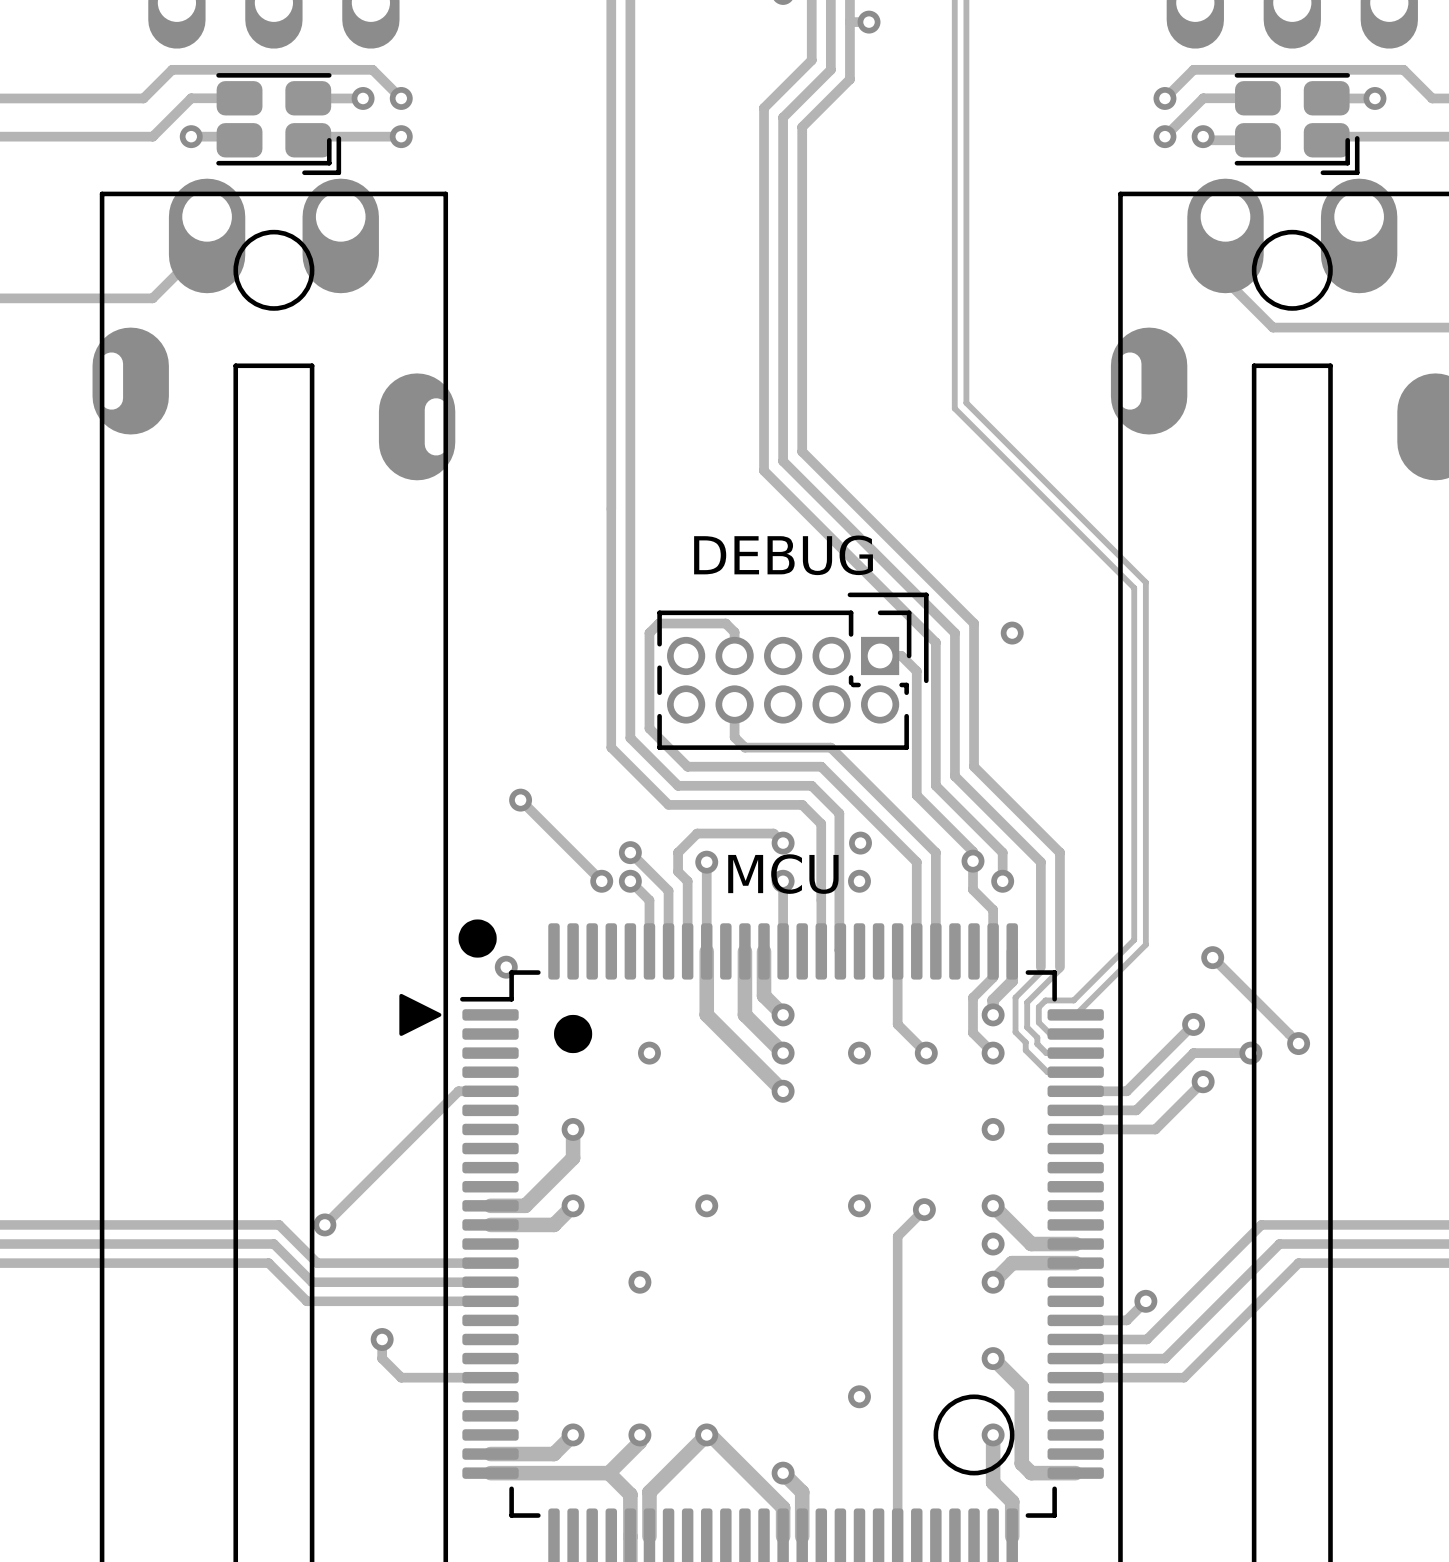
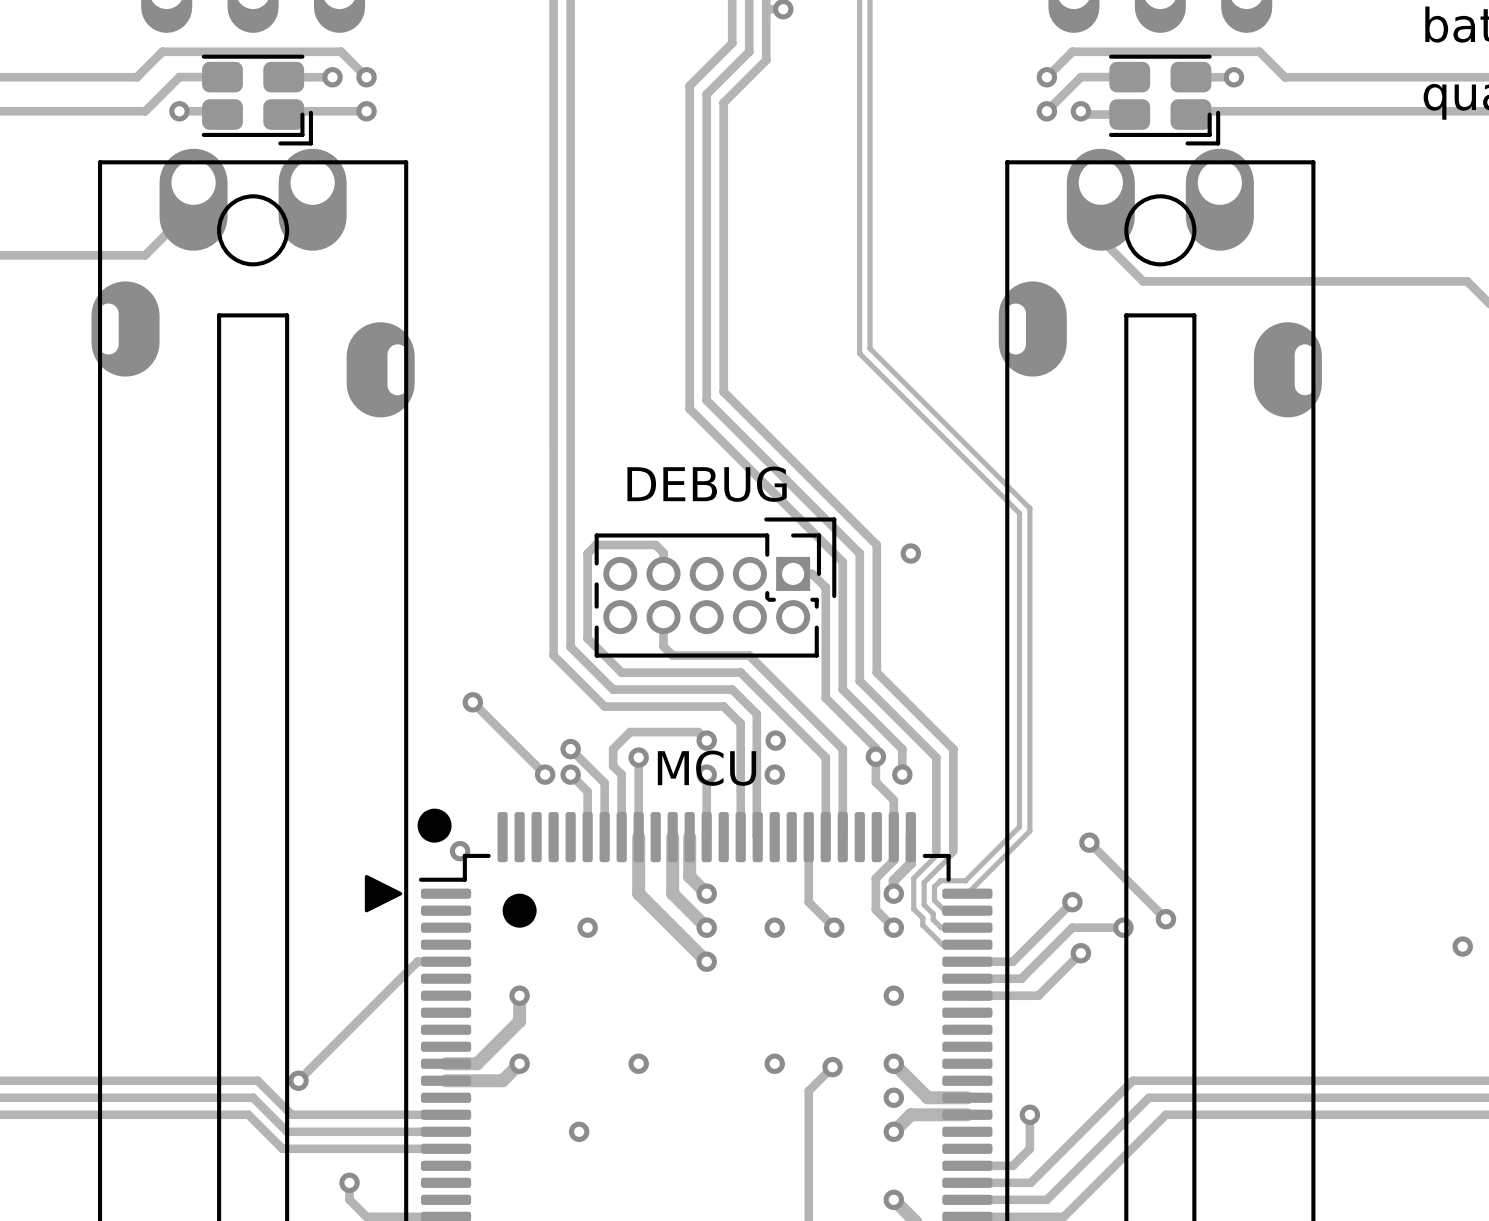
track: none -> (1029, 1114) (1029, 1148)
via position: (1145, 1301) -> (1029, 1114)

